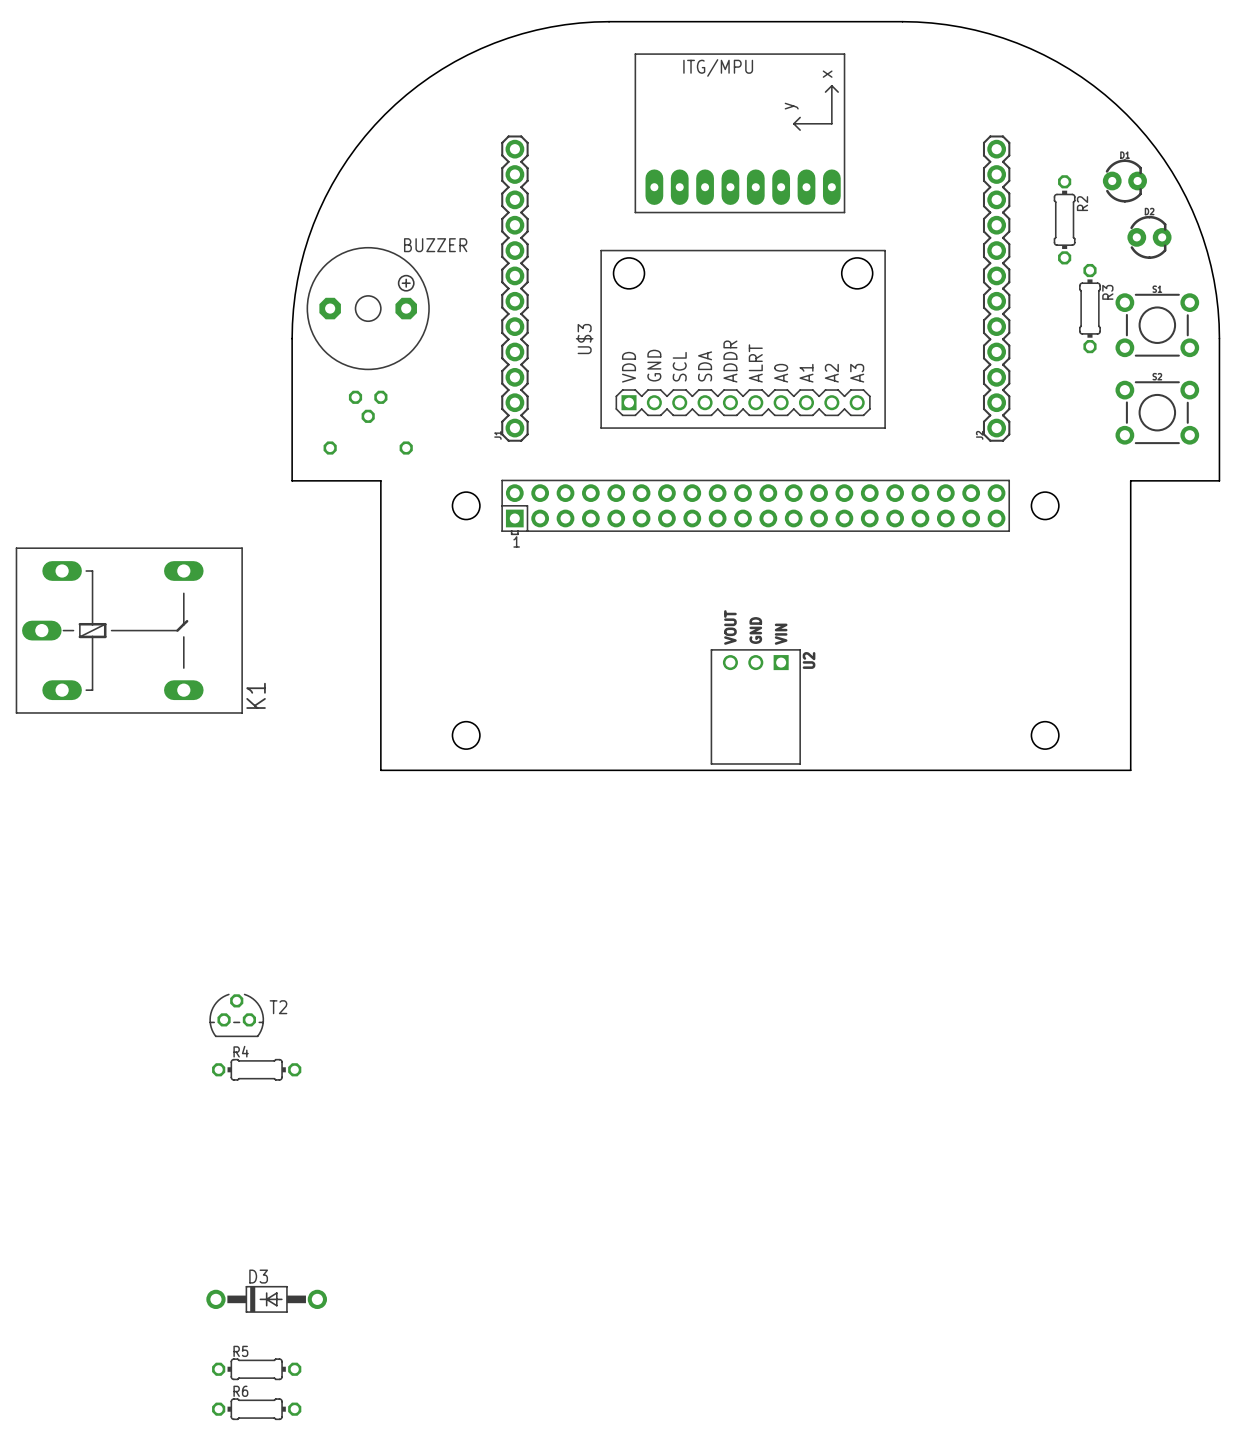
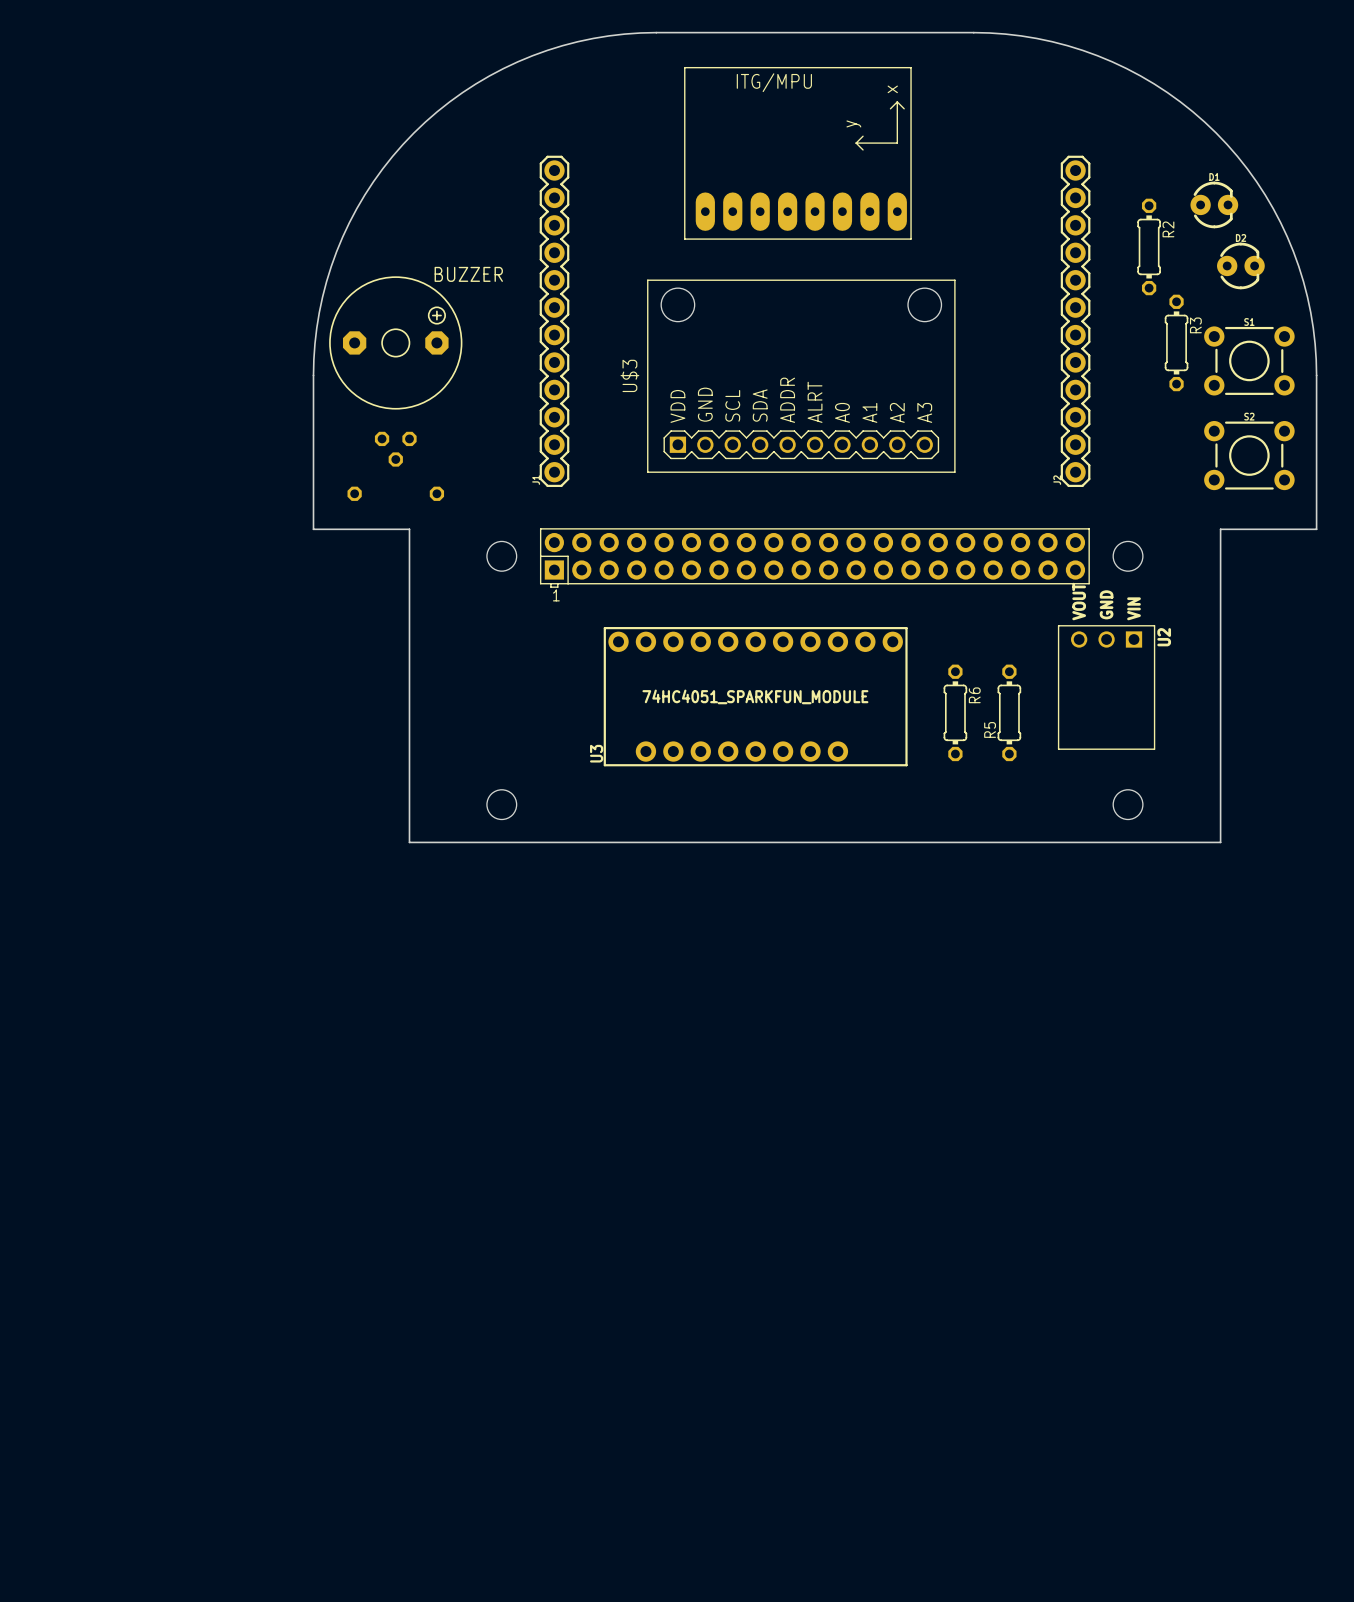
K1: (129, 630) -> none
U3: none -> (755, 696)
U2 position: (755, 706) -> (1106, 687)
T2: (236, 1015) -> none
R4: (256, 1069) -> none
D3: (266, 1299) -> none
R5 name position: R5 (240, 1351) -> R5 (990, 729)
R5 rotation: 0° (256, 1369) -> 90° clockwise (1009, 712)
R5 position: (256, 1369) -> (1009, 712)
R6 rotation: 0° (256, 1409) -> 90° clockwise (955, 712)
R6 position: (256, 1409) -> (955, 712)

